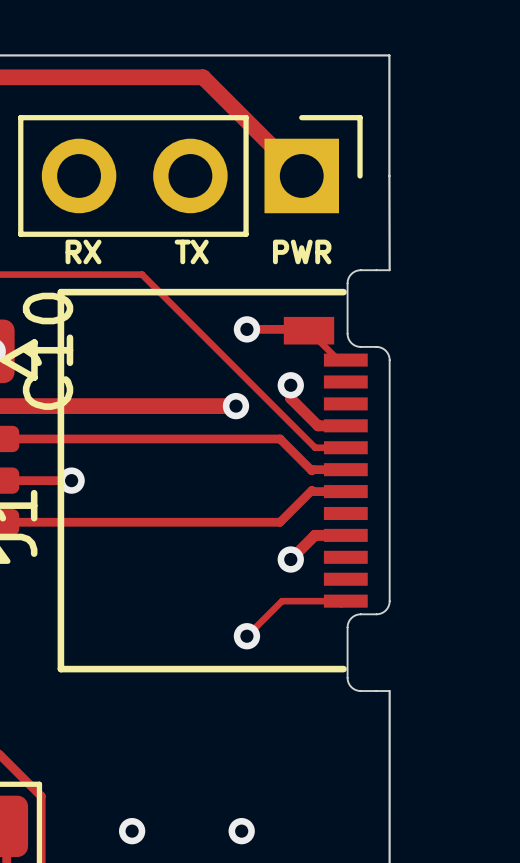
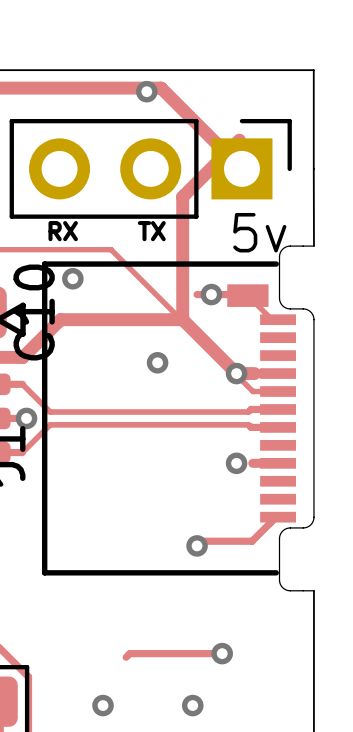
via: none -> (146, 91)
track: none -> (239, 140) (182, 196) (182, 319)
text: PWR (302, 251) -> 5v (259, 232)
via: none -> (72, 278)
via position: (246, 329) -> (211, 294)
track: (290, 385) (290, 398) (318, 425) -> (182, 319) (236, 373) (255, 373)
via: (290, 385) -> none
track: (34, 406) (235, 406) -> (22, 357) (60, 319) (182, 319)
via: (235, 406) -> none
via: none -> (157, 362)
via: none -> (236, 373)
track: (33, 438) (280, 438) (311, 470) -> (22, 384) (50, 412) (248, 412) (251, 409)
track: (38, 480) (71, 480) -> none
via position: (71, 480) -> (26, 418)
track: (311, 490) (280, 522) (33, 522) -> (251, 427) (248, 424) (50, 424) (22, 452)
track: (314, 535) (290, 559) -> none
via position: (290, 559) -> (236, 463)
track: (345, 601) (282, 601) (246, 636) -> none
track: none -> (274, 518) (252, 541) (201, 541)
track: none -> (222, 653) (129, 653) (126, 657)
via: none -> (222, 653)

